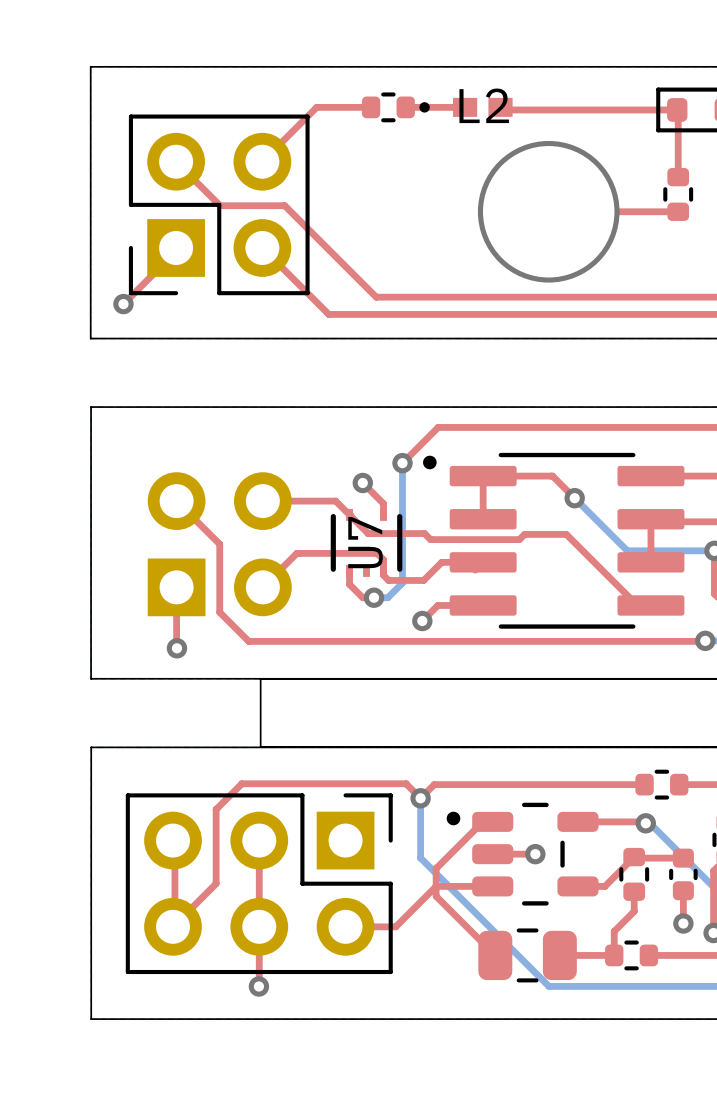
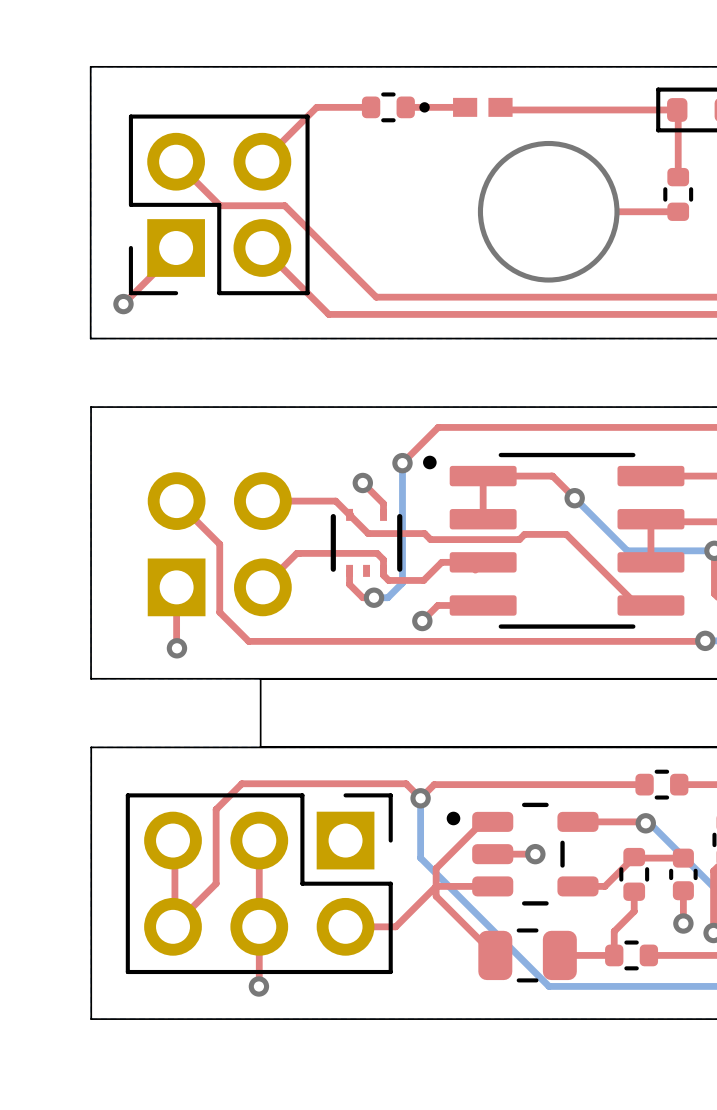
L2 name: L2 (484, 105) -> none
U7 name: U7 (365, 542) -> none

